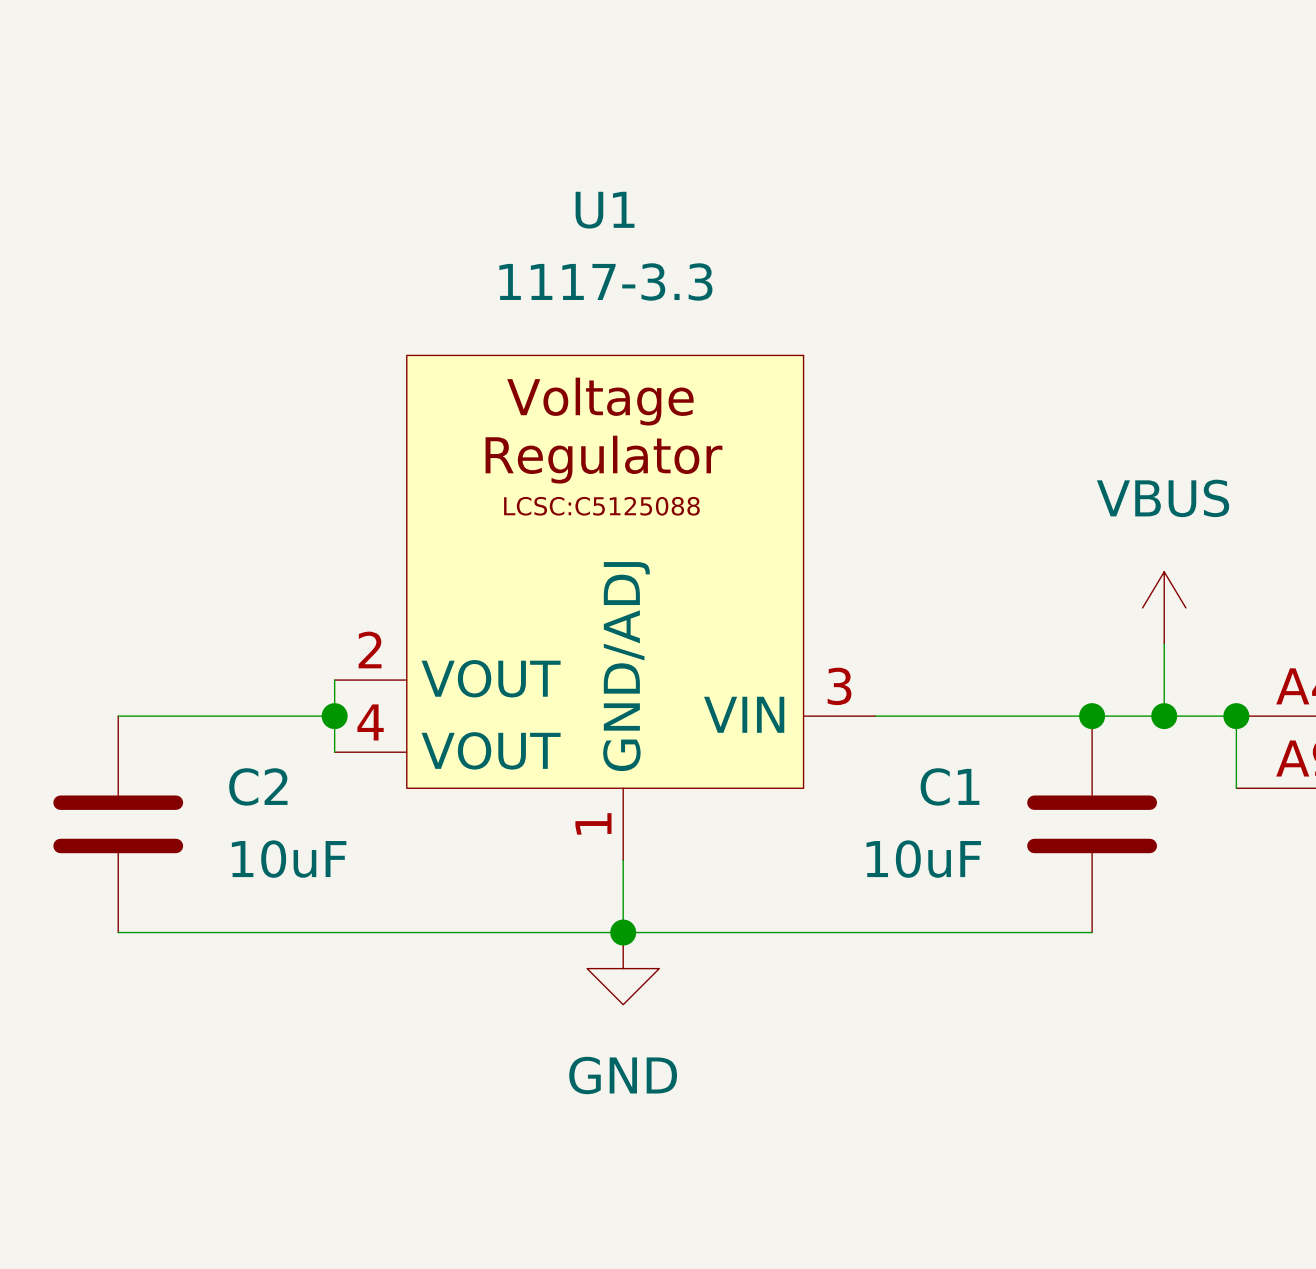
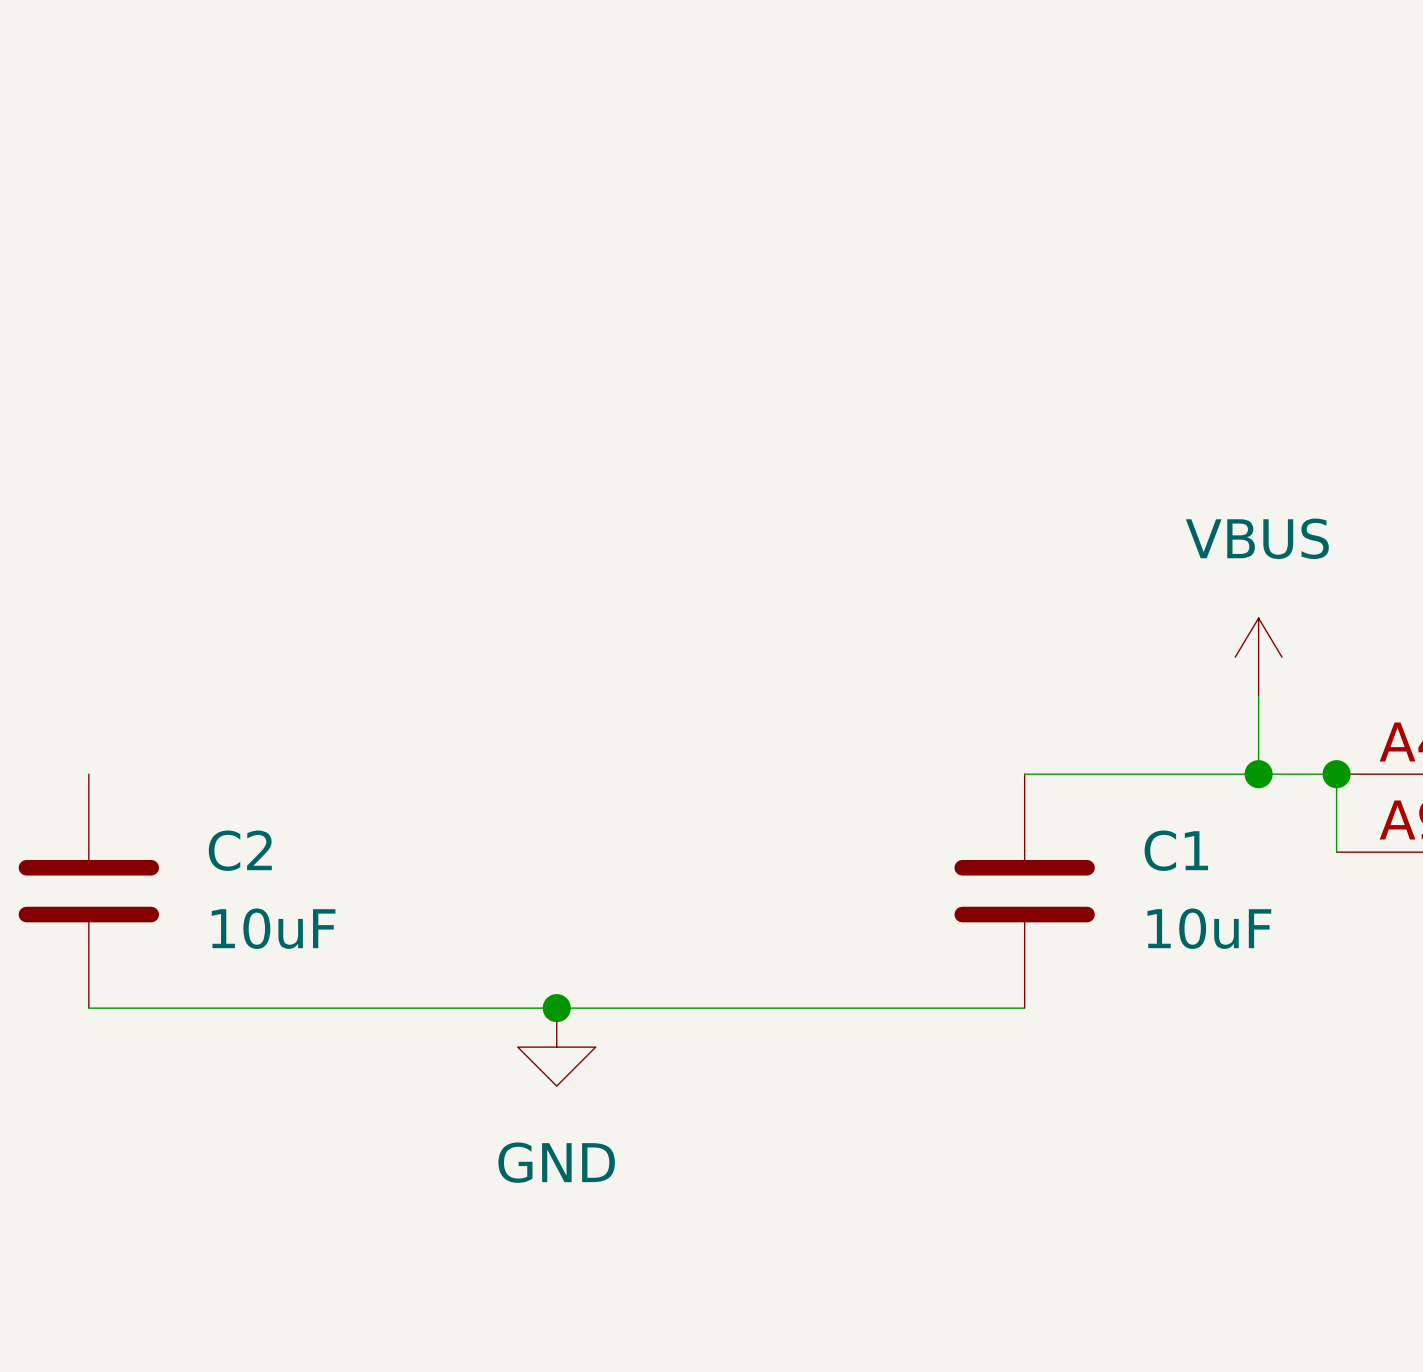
U1: 1117-3.3 (605, 607) -> none
wire: (334, 680) (334, 752) -> none
wire: (118, 716) (334, 716) -> none
junction: (334, 716) -> none
wire: (875, 716) (947, 716) -> none
junction: (1092, 716) -> none
C1 name position: C1 (949, 786) -> C1 (1176, 850)
C2 position: (118, 824) -> (88, 891)
C1 position: (1092, 824) -> (1024, 891)
C1 value position: 10uF (923, 859) -> 10uF (1209, 928)
wire: (623, 860) (623, 932) -> none
wire: none -> (88, 1008) (127, 1008)
junction position: (623, 932) -> (556, 1008)
wire: (947, 932) (1092, 932) -> none
power symbol position: GND (623, 968) -> GND (556, 1047)

